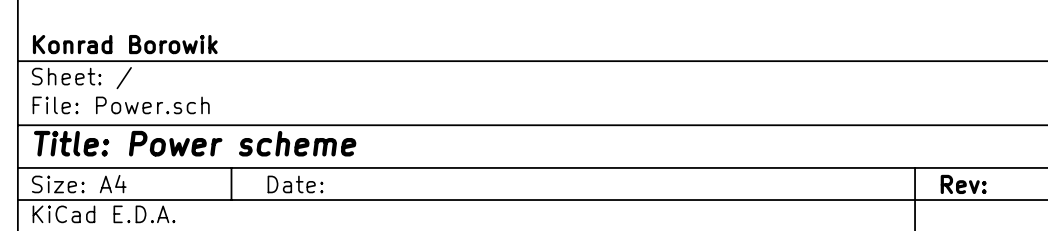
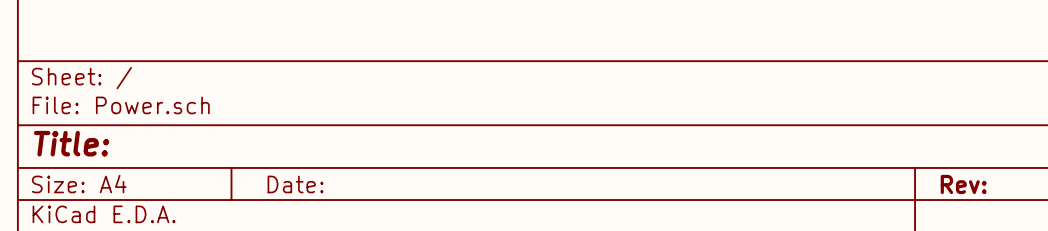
title block: Konrad Borowik (125, 44) -> none
title block: Title: Power scheme (195, 143) -> Title: (71, 143)

